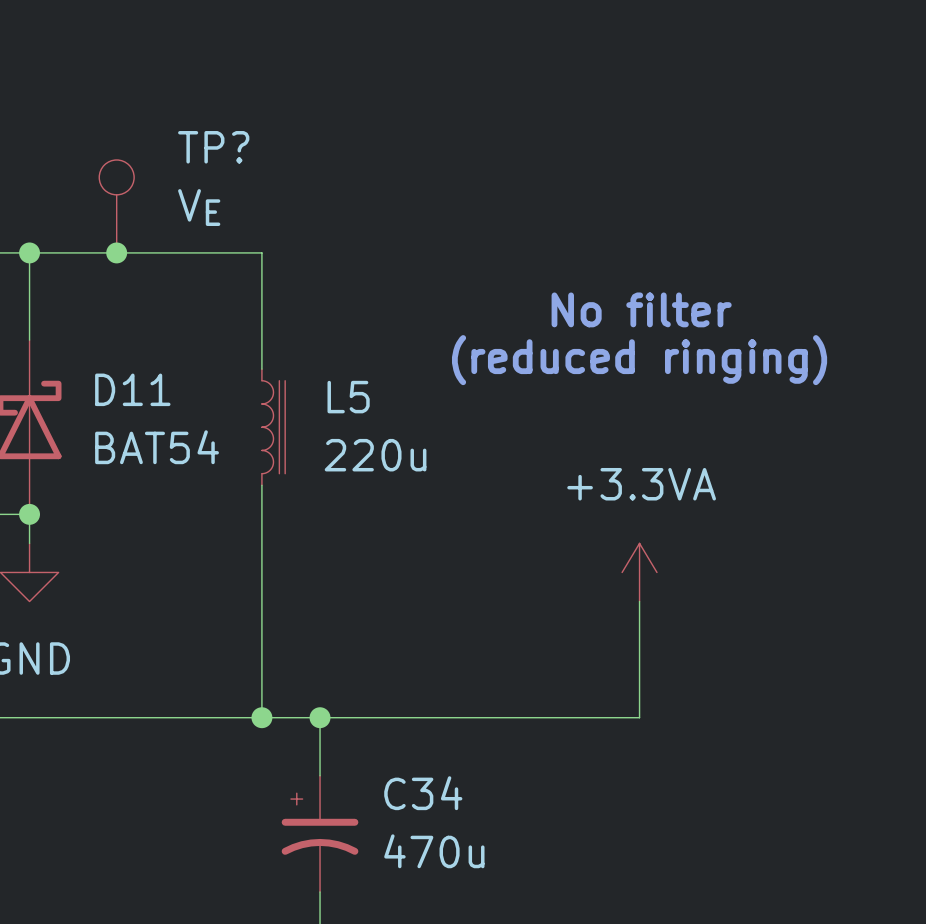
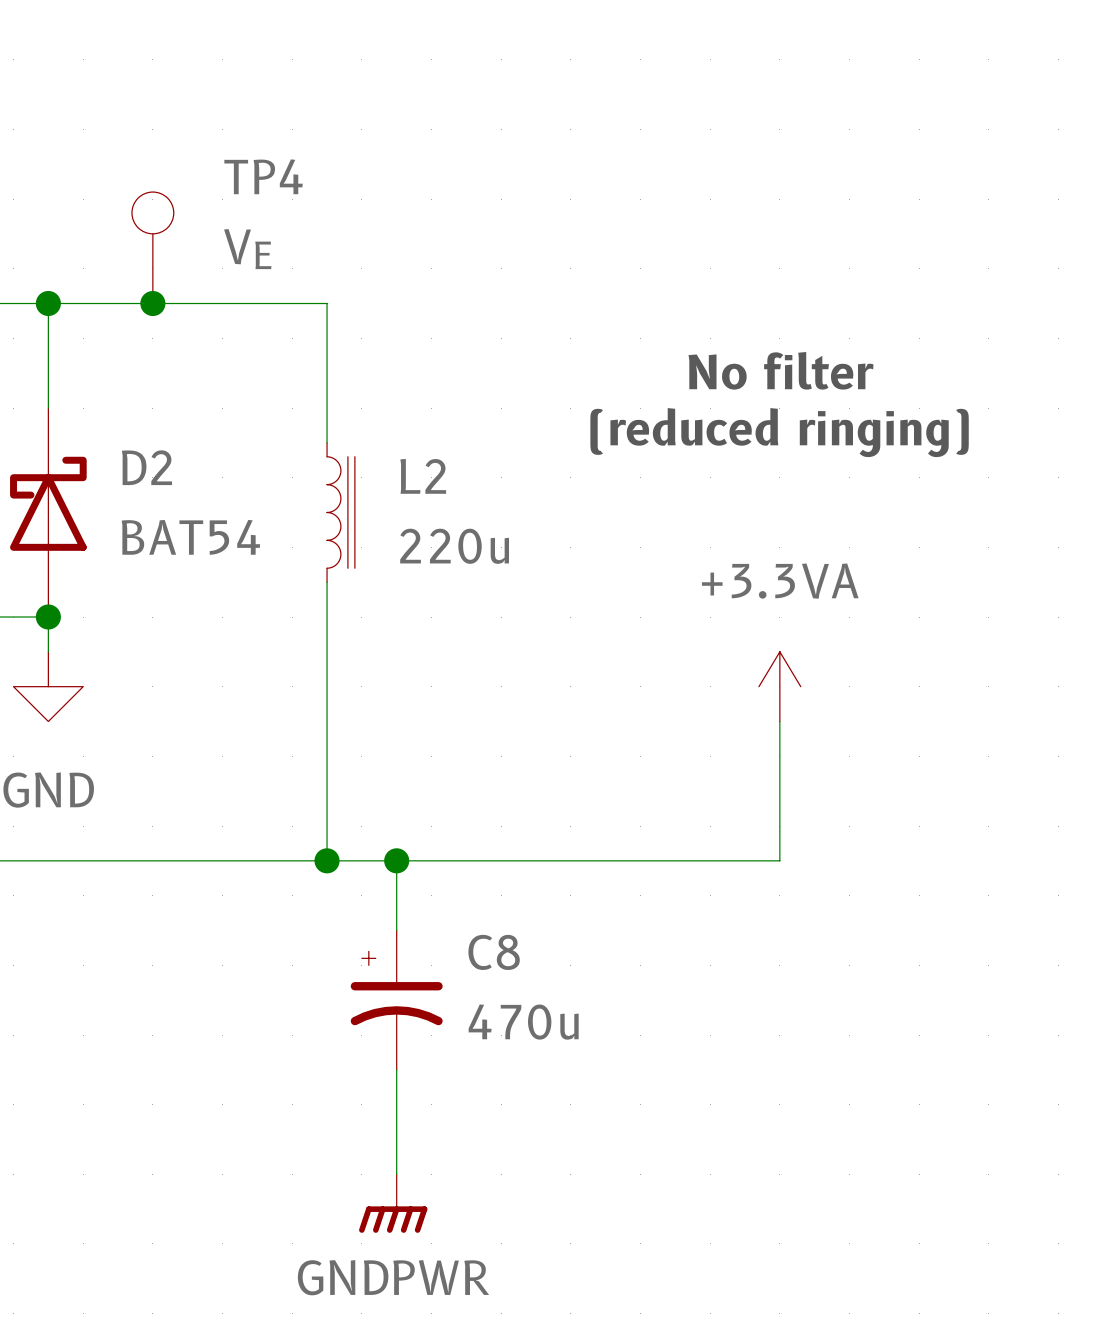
TP? name: TP? (213, 147) -> TP4 (263, 176)
D11 name: D11 (132, 389) -> D2 (146, 467)
L5 name: L5 (348, 397) -> L2 (423, 476)
C34 name: C34 (423, 793) -> C8 (494, 952)

